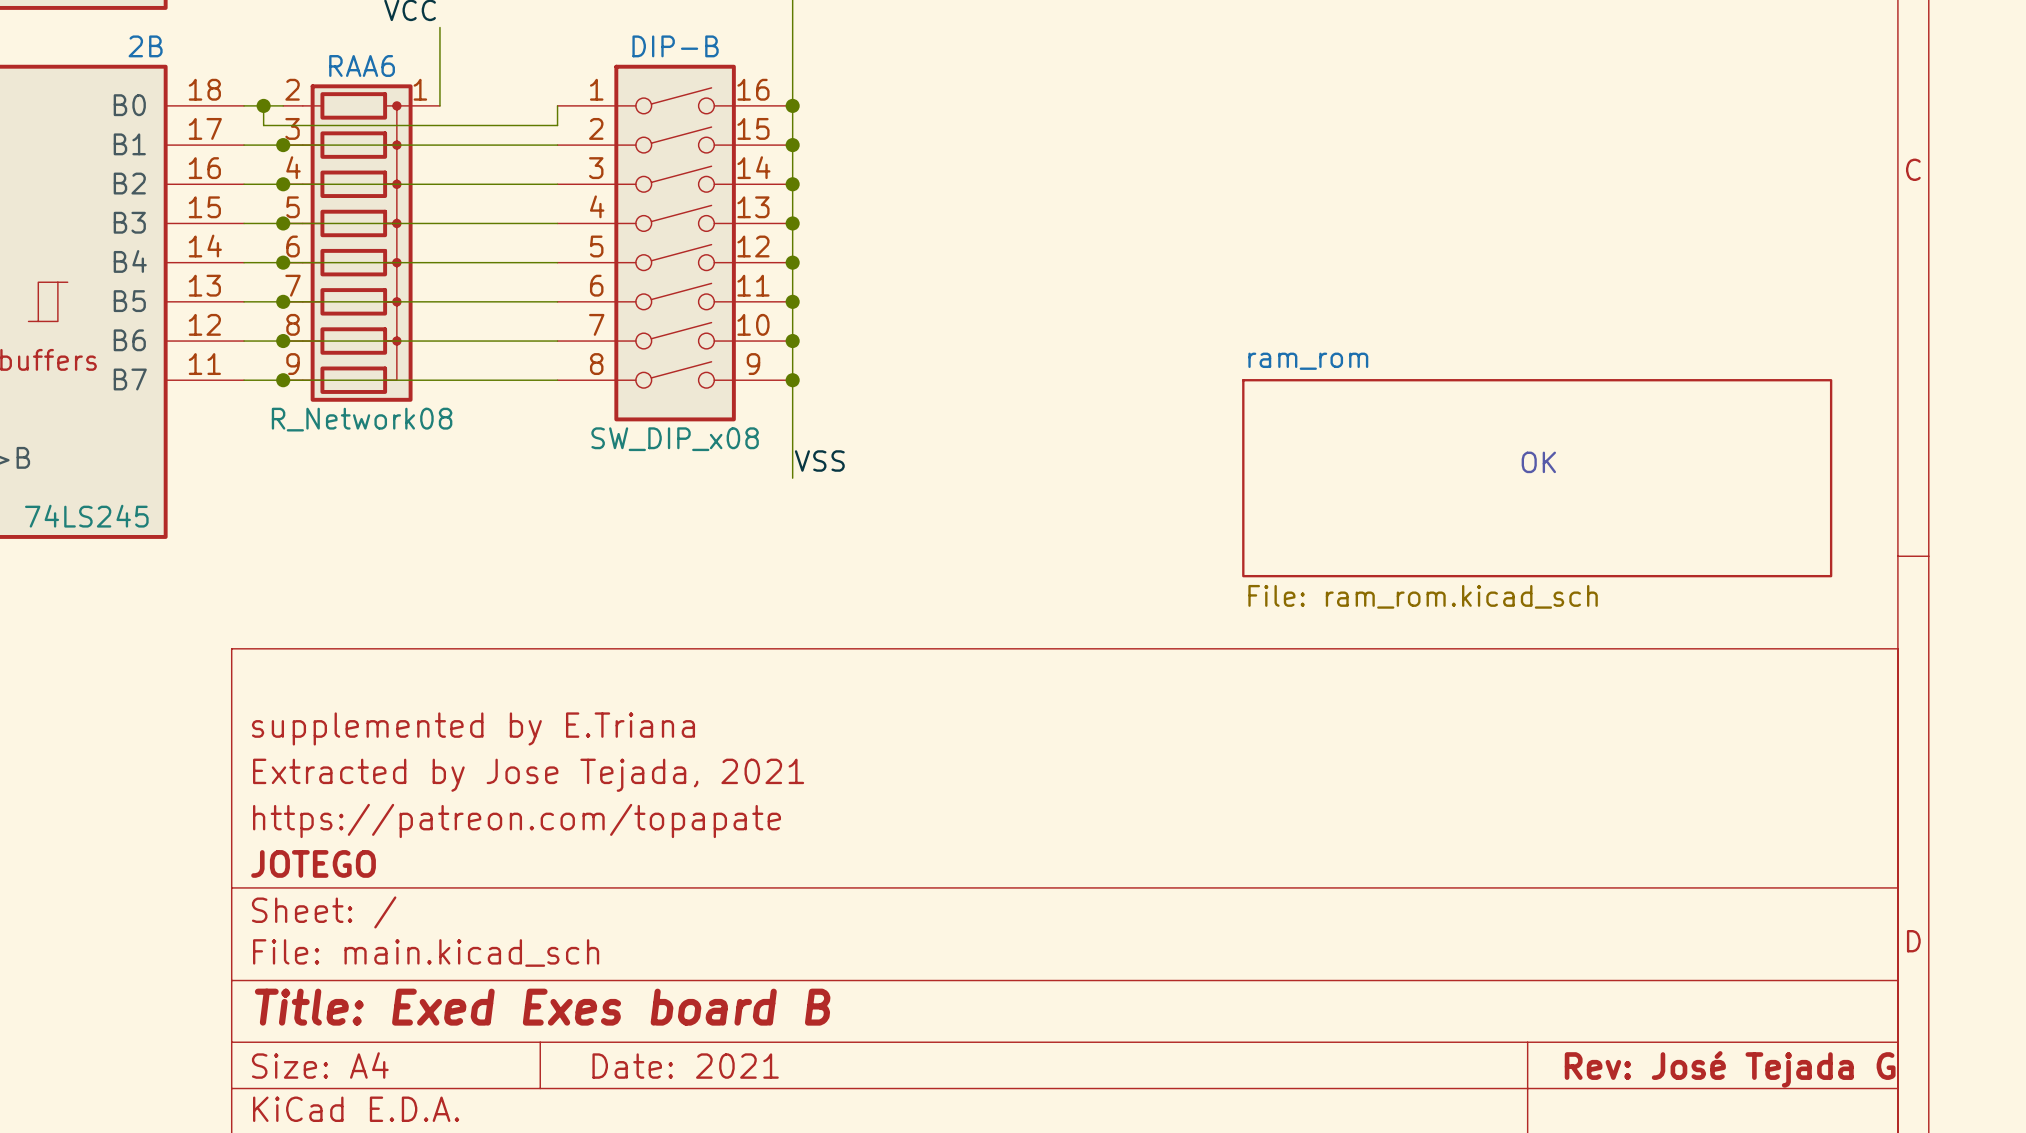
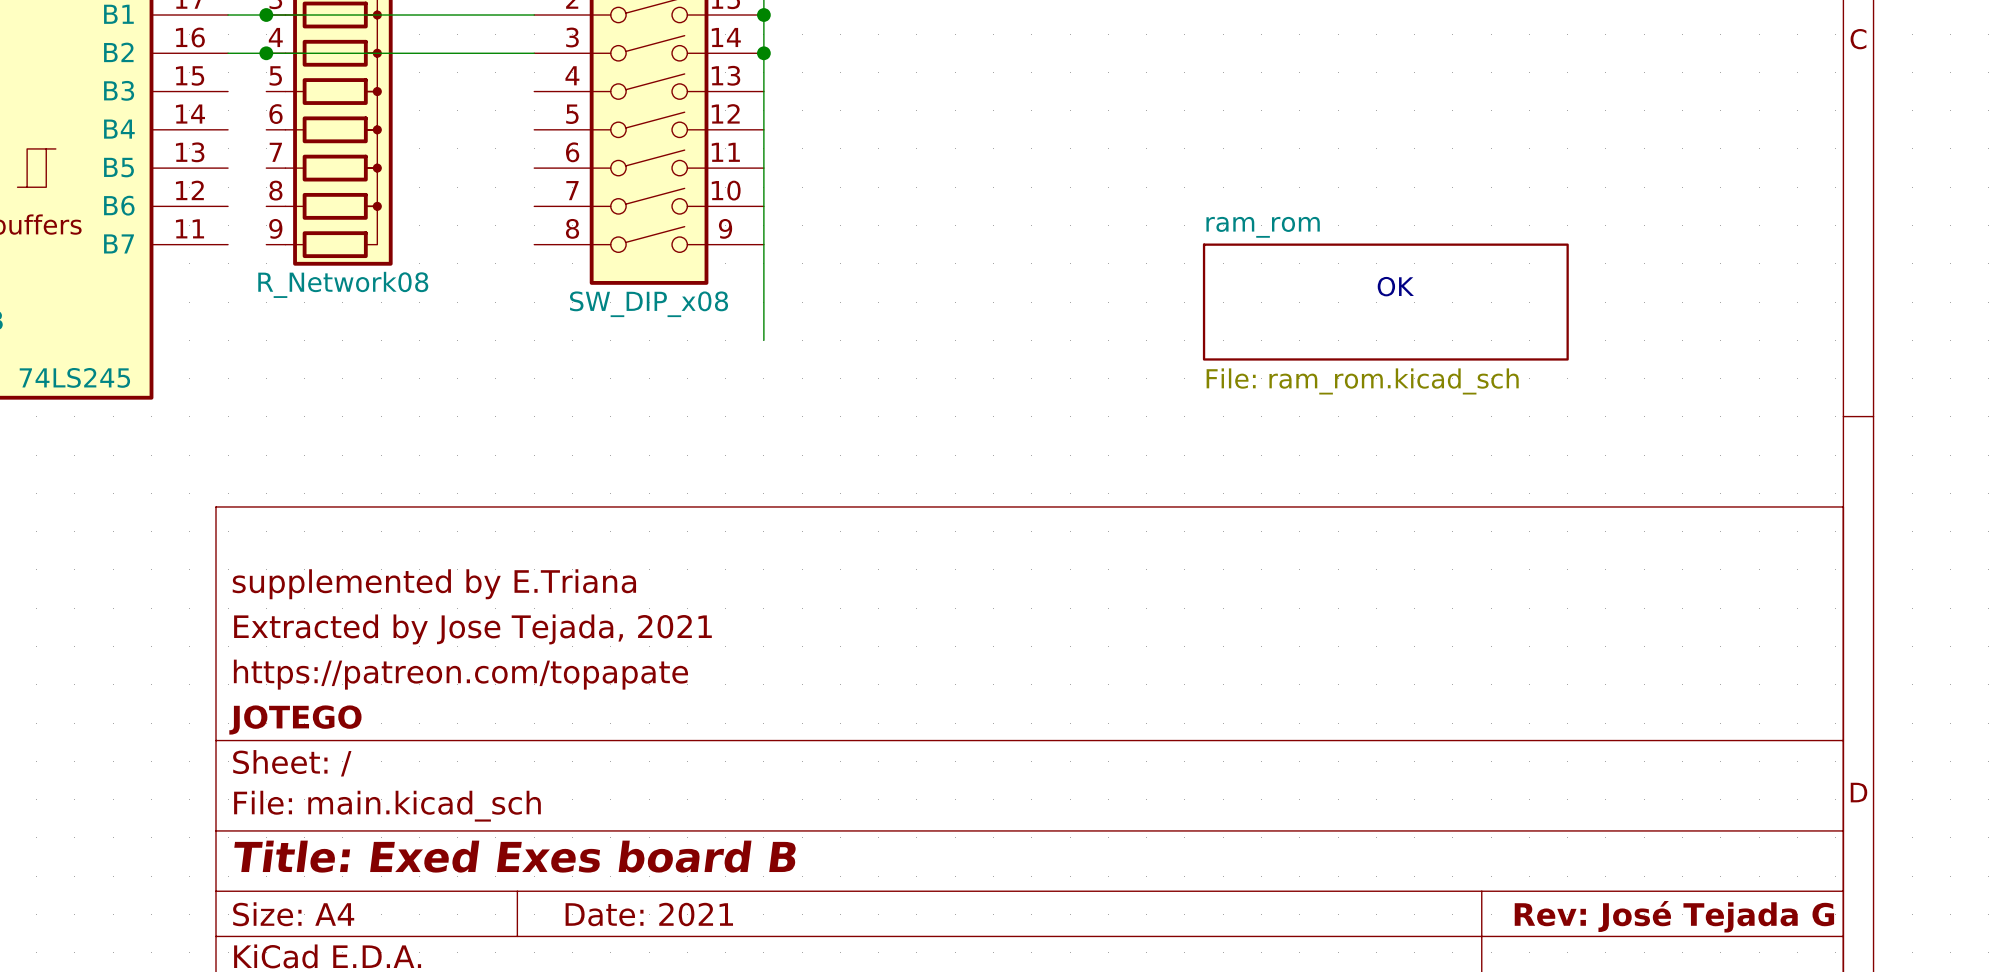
wire: (244, 223) (557, 223) -> none
junction: (283, 223) -> none
junction: (792, 223) -> none
wire: (244, 262) (557, 262) -> none
junction: (283, 262) -> none
junction: (792, 262) -> none
wire: (244, 301) (557, 301) -> none
junction: (283, 301) -> none
junction: (792, 301) -> none
wire: (244, 341) (557, 341) -> none
junction: (283, 341) -> none
junction: (792, 341) -> none
wire: (244, 380) (557, 380) -> none
junction: (283, 380) -> none
junction: (792, 380) -> none
sheet ram_rom: none -> File: ram_rom.kicad_sch (1385, 302)
label: VSS (819, 461) -> none
text position: OK (1538, 462) -> OK (1395, 286)
sheet ram_rom: File: ram_rom.kicad_sch (1537, 478) -> none

